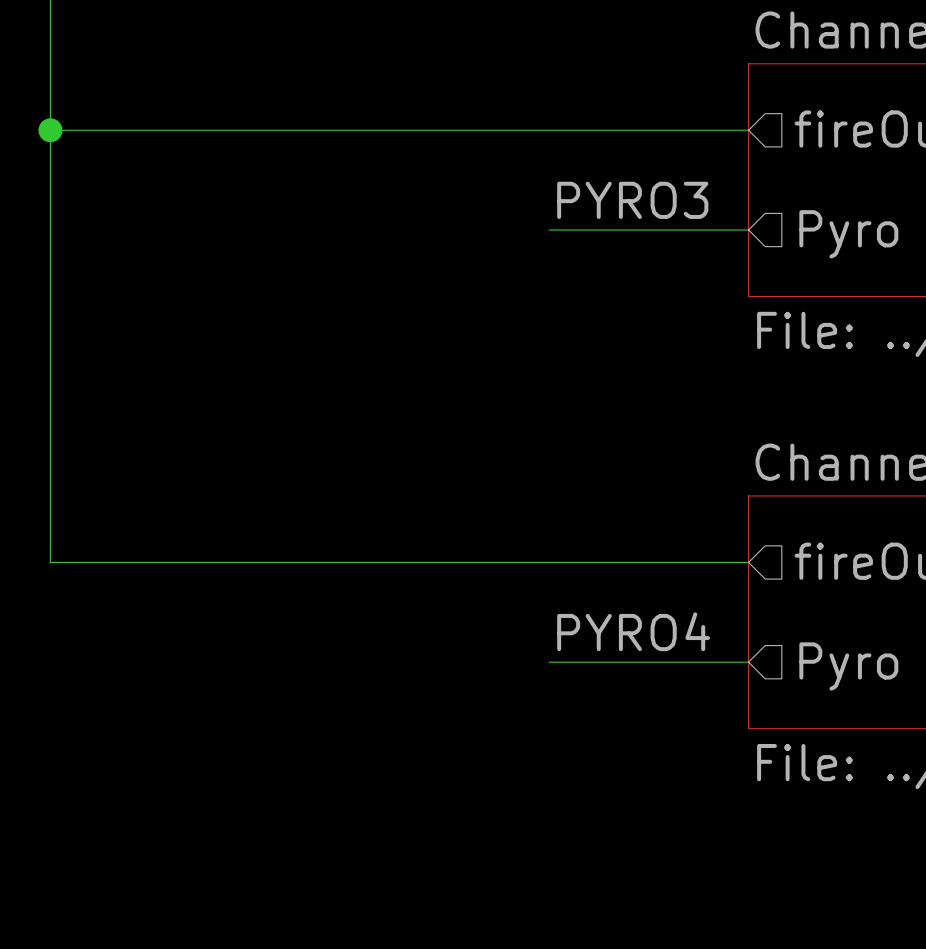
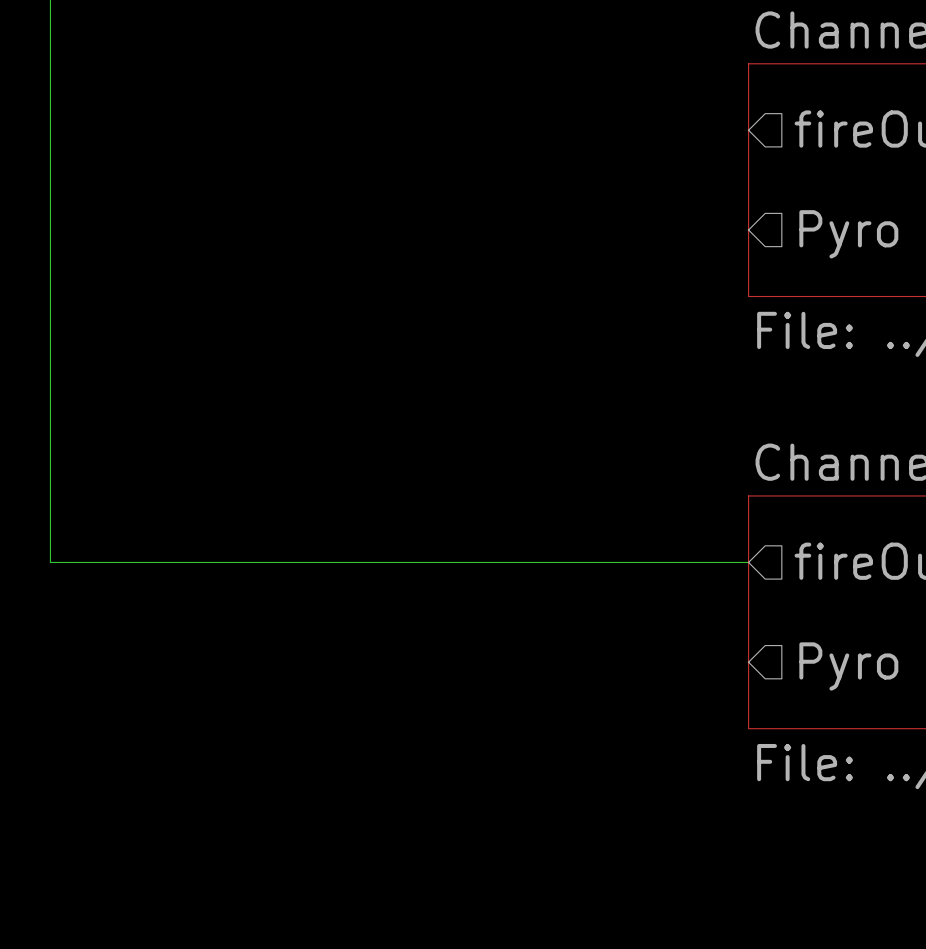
wire: (50, 130) (748, 130) -> none
junction: (50, 130) -> none
label: PYRO3 (632, 200) -> none
wire: (549, 230) (748, 230) -> none
label: PYRO4 (633, 631) -> none
wire: (549, 662) (748, 662) -> none

